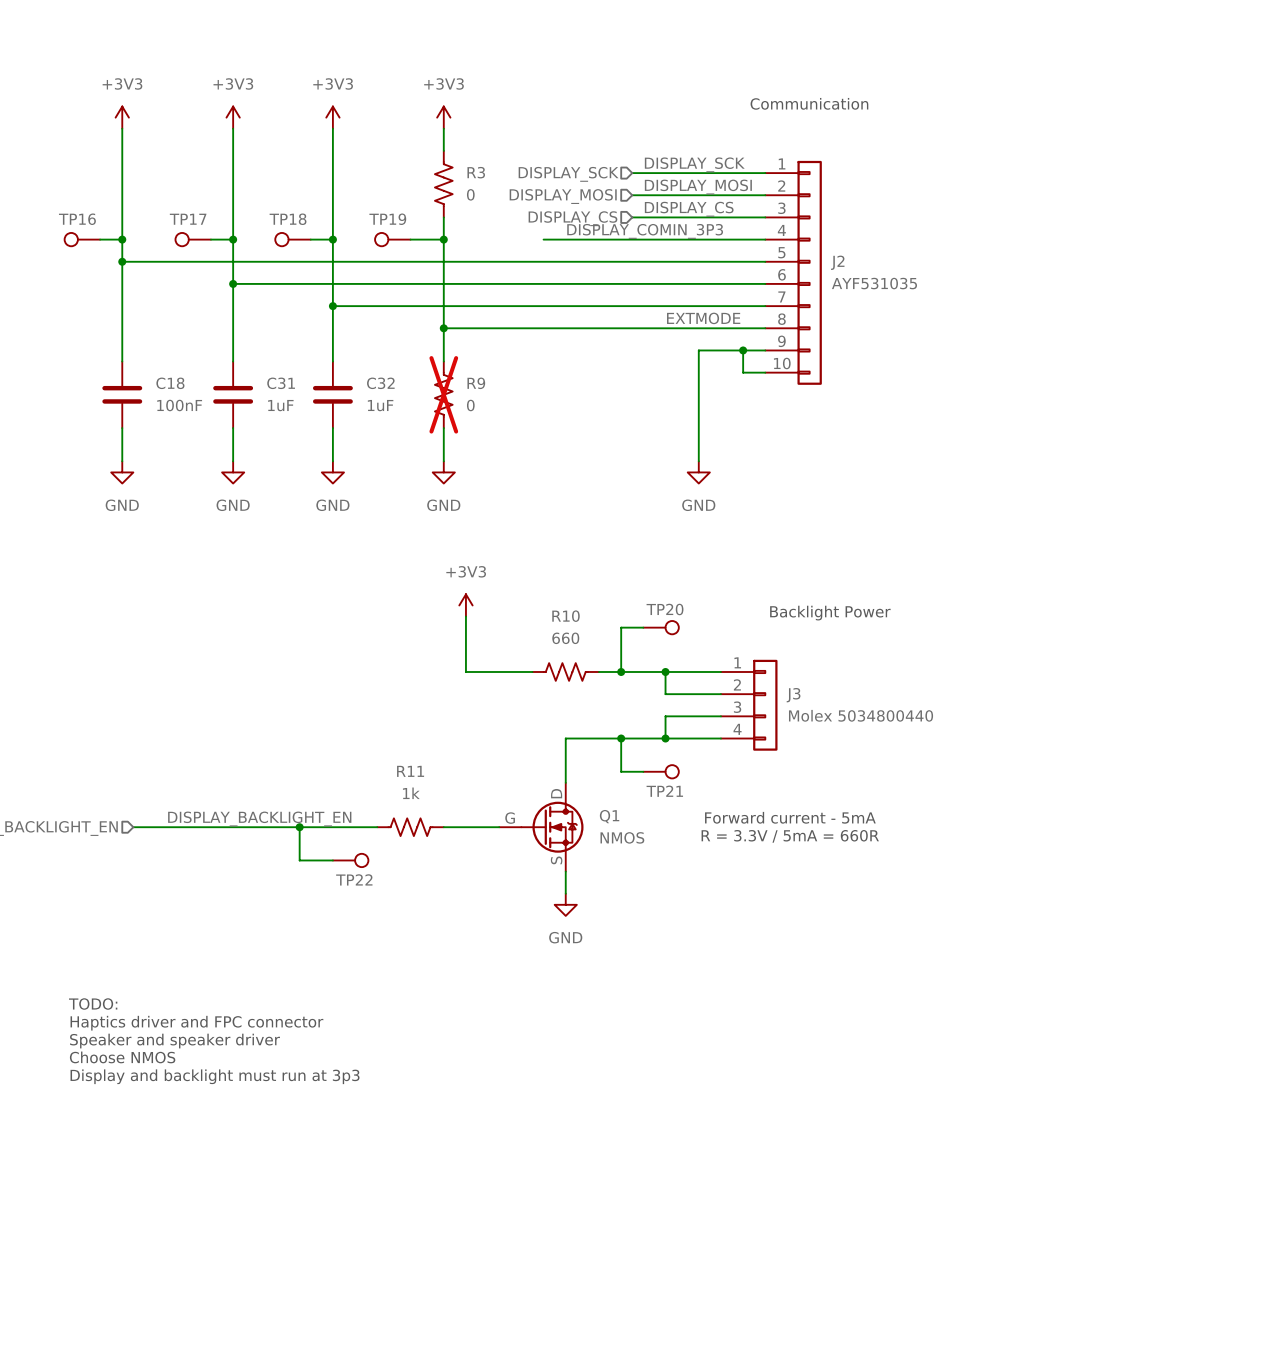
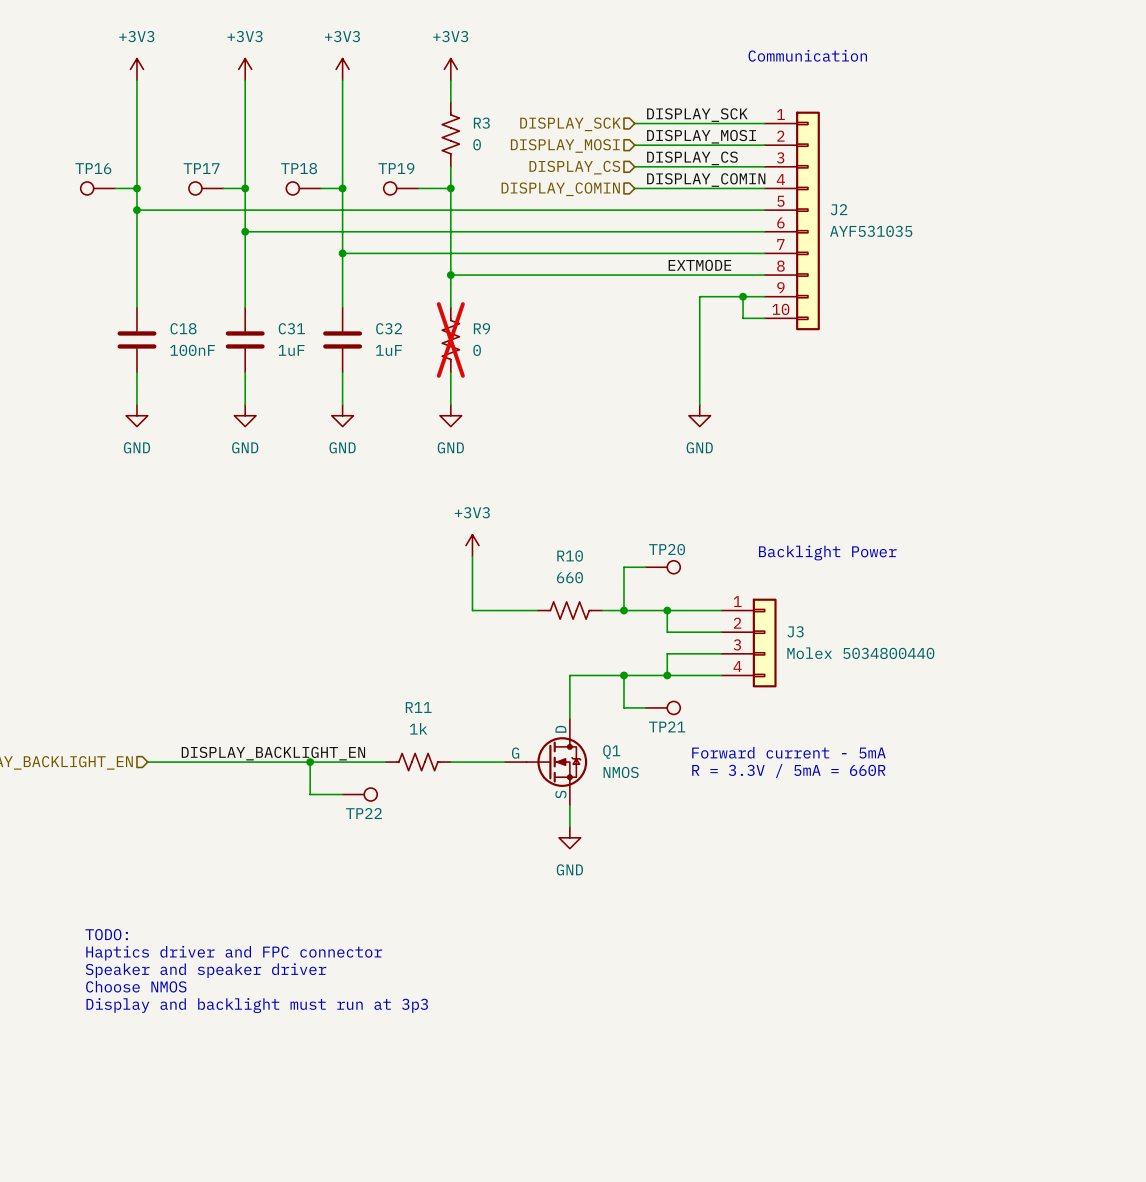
label: DISPLAY_COMIN_3P3 (645, 231) -> DISPLAY_COMIN (706, 180)
wire: (543, 239) (632, 239) -> none
hierarchical label: none -> DISPLAY_COMIN (560, 189)

